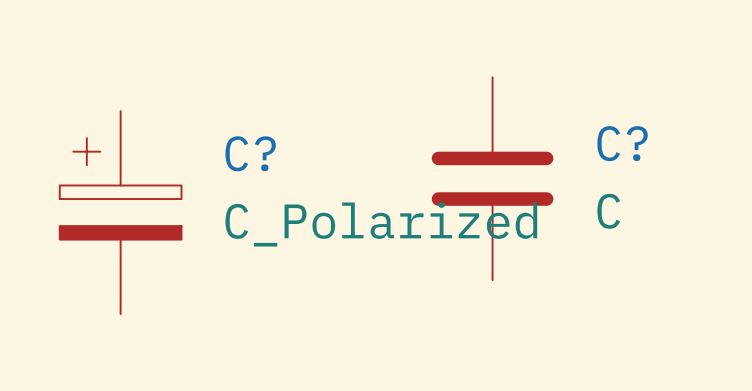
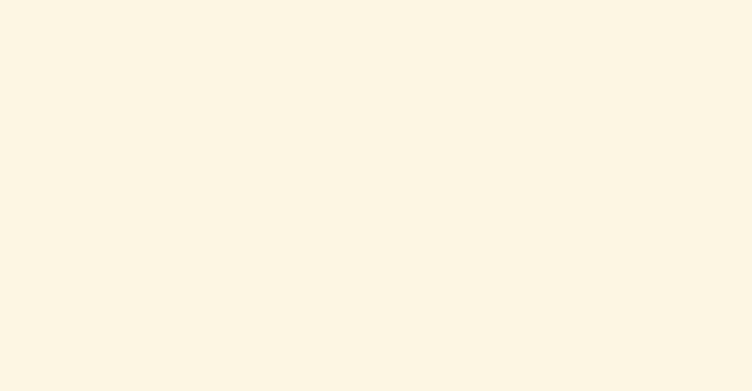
C?: C (492, 178) -> none
C?: C_Polarized (120, 212) -> none

